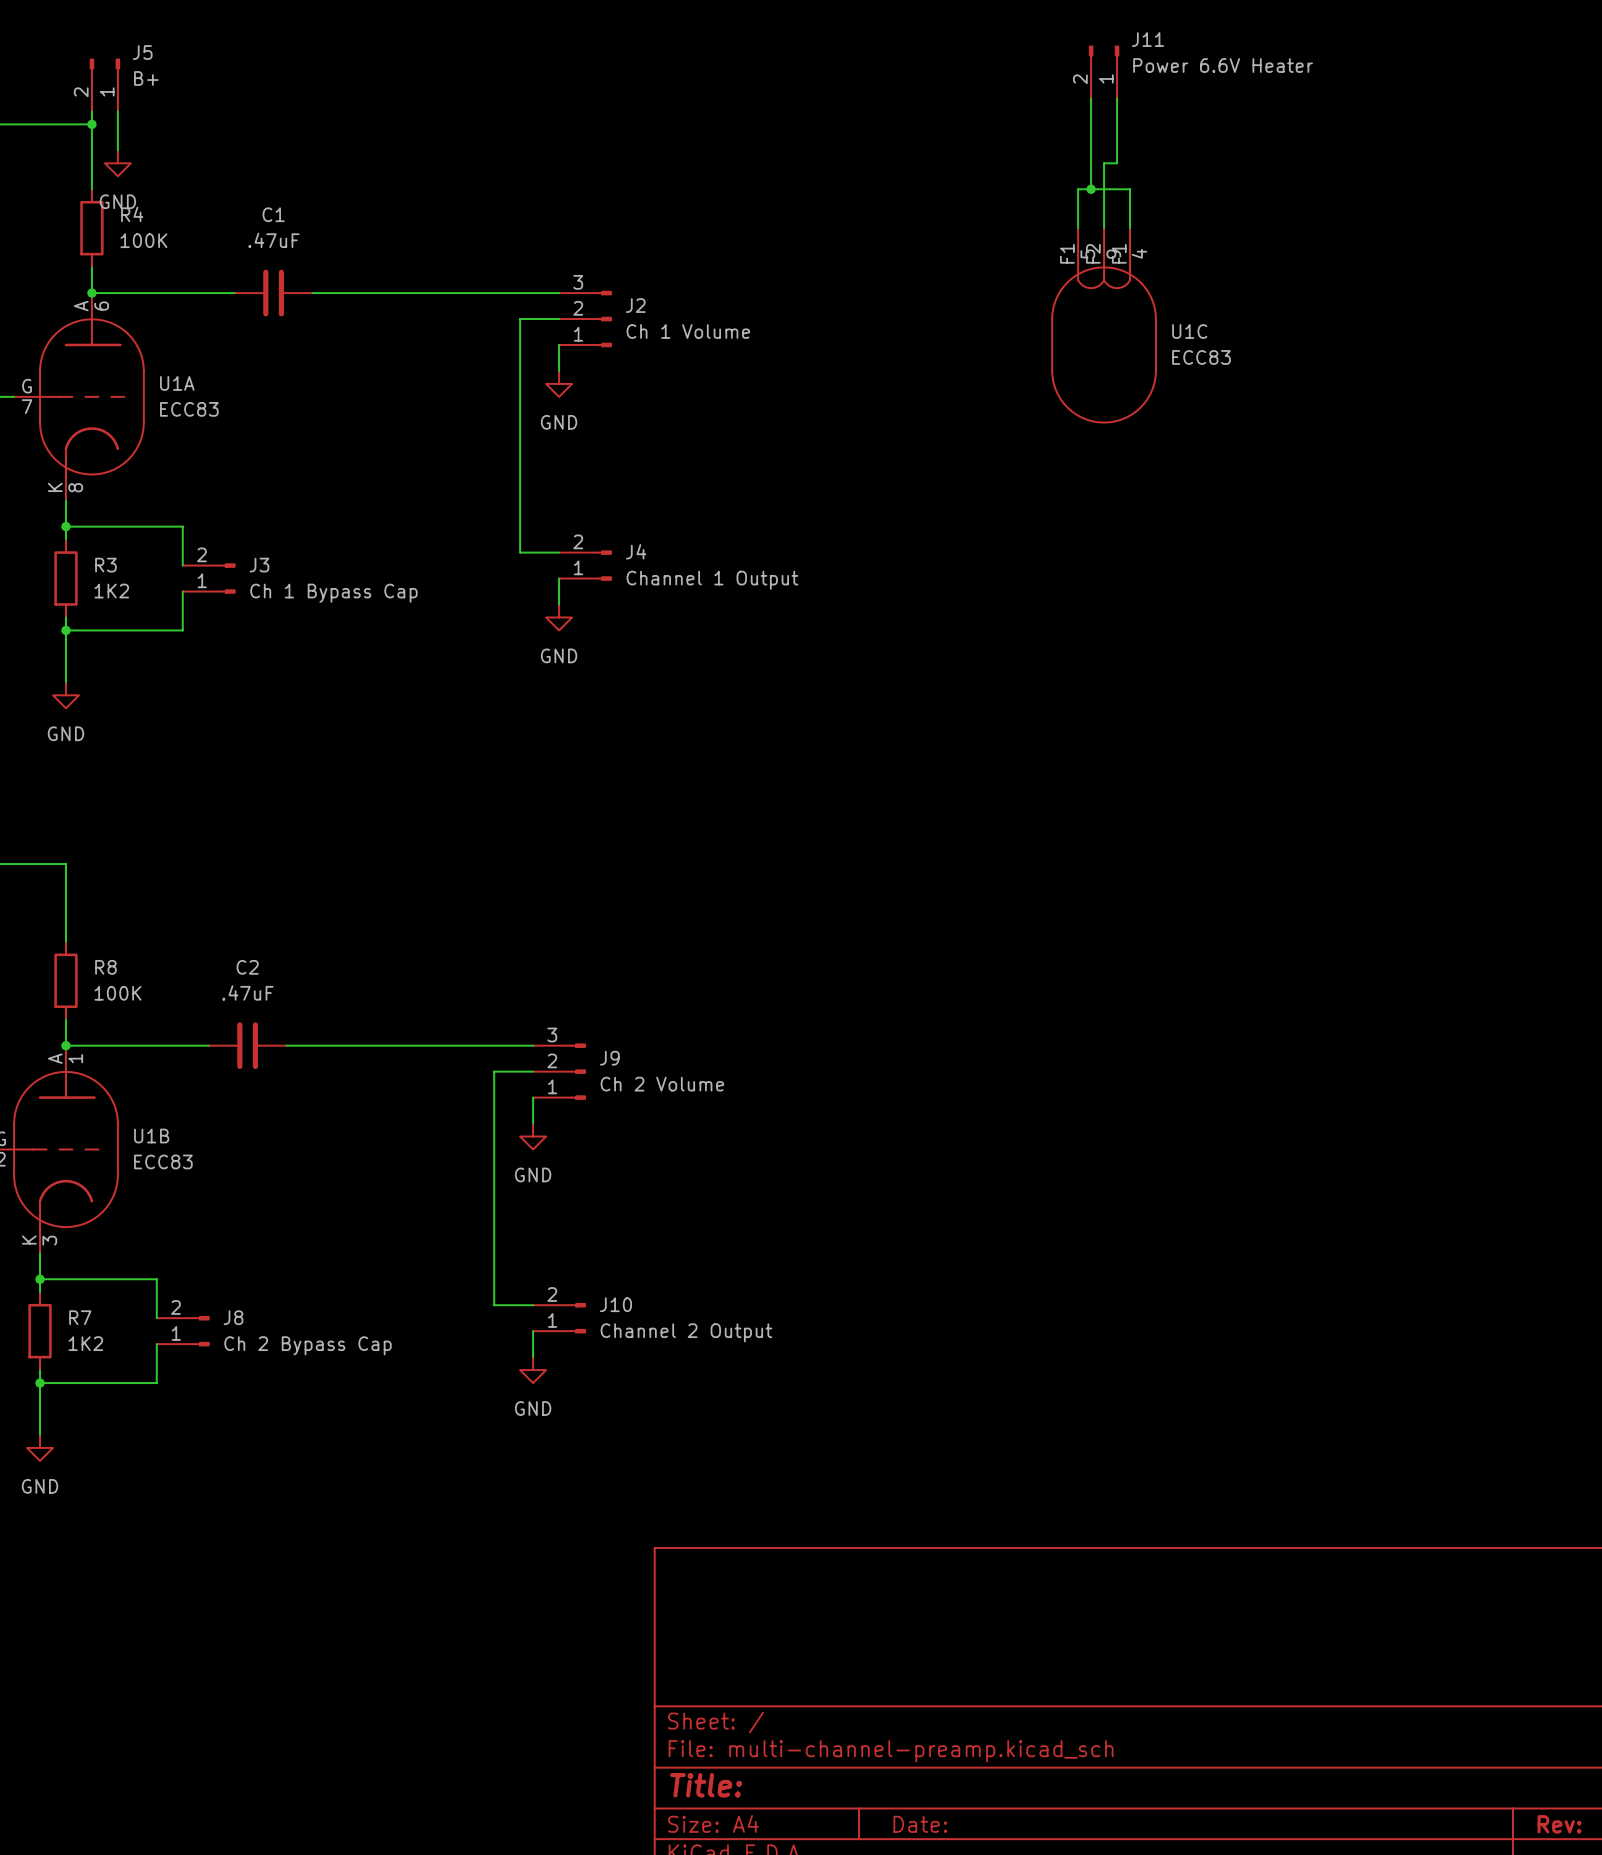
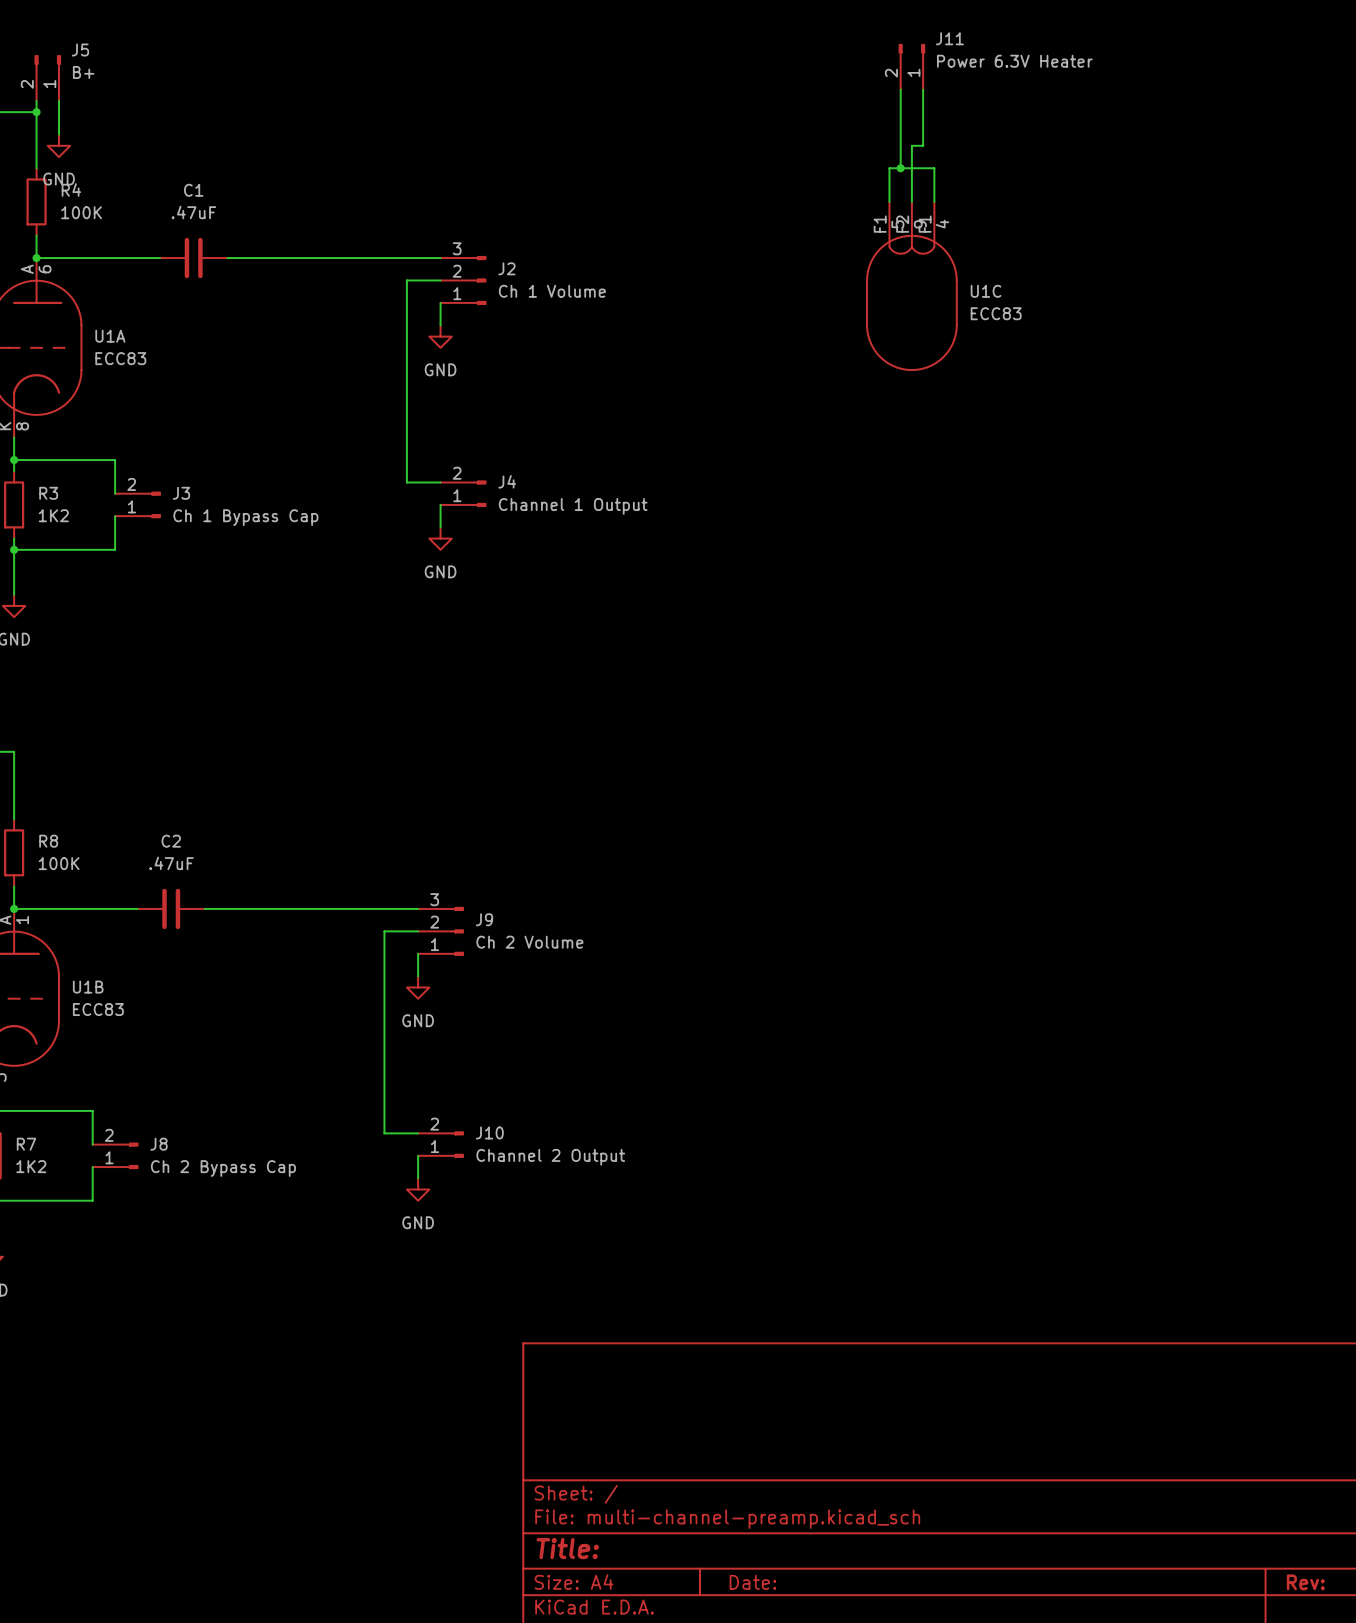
J11 value: Power 6.6V Heater (1223, 65) -> Power 6.3V Heater (1014, 61)

